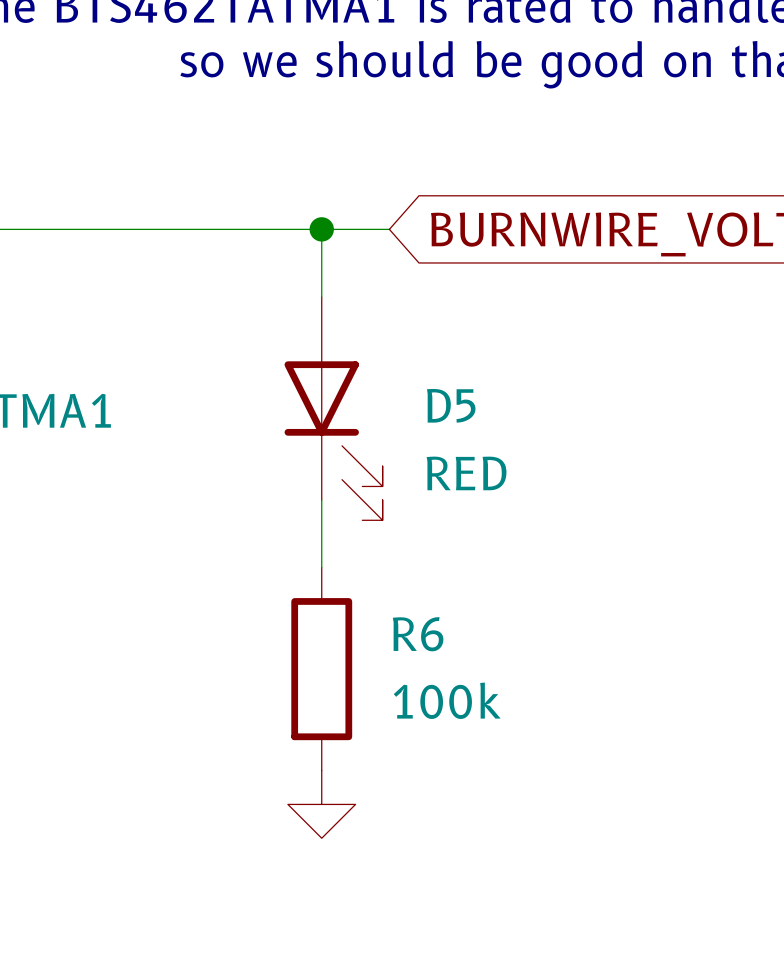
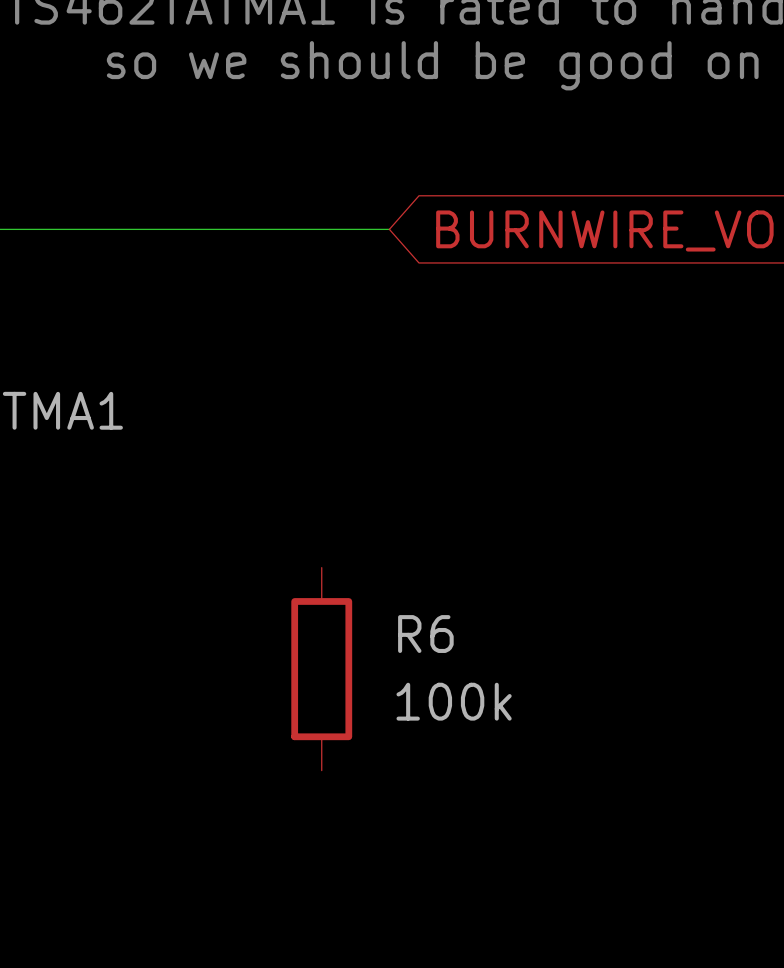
wire: (321, 229) (321, 297) -> none
junction: (321, 229) -> none
D5: RED (333, 408) -> none
wire: (321, 499) (321, 567) -> none
power symbol: (321, 804) -> none

